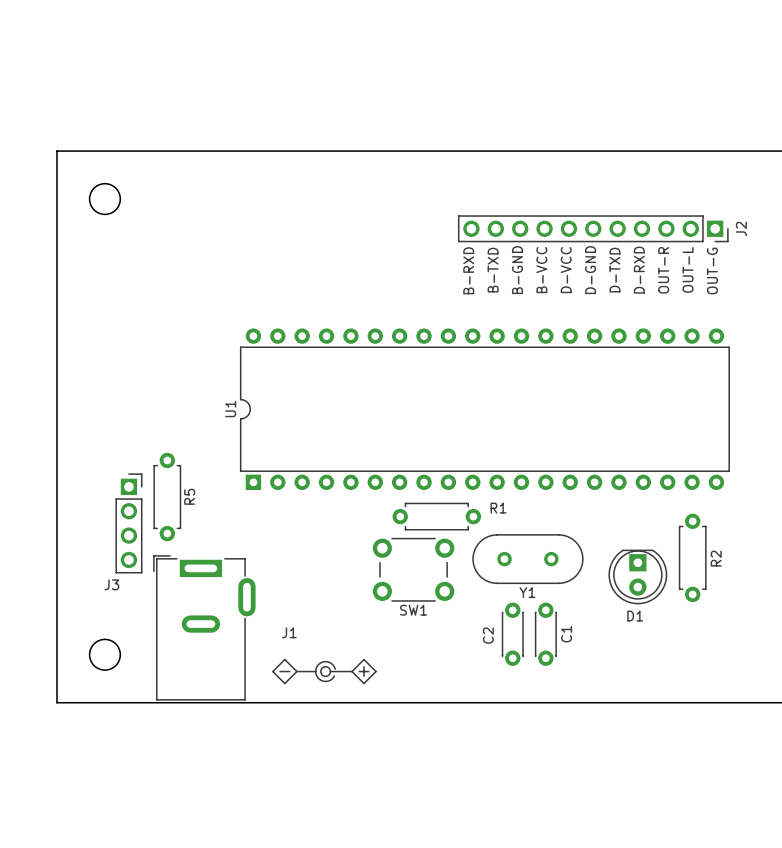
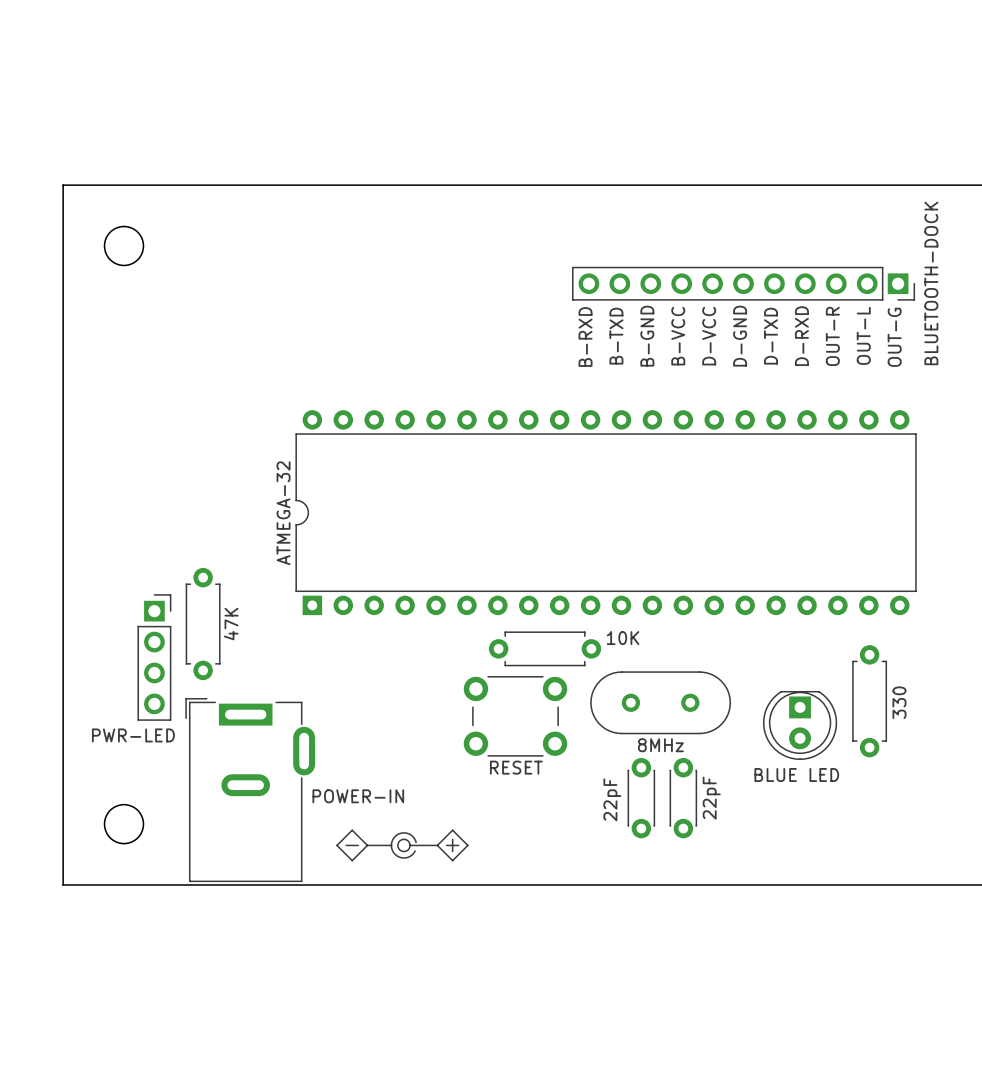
J2 name: J2 (741, 229) -> BLUETOOTH-DOCK (931, 283)
U1 name: U1 (230, 408) -> ATMEGA-32 (283, 513)
R5 name: R5 (189, 496) -> 47K (231, 624)
R1 name: R1 (498, 508) -> 10K (623, 638)
R2 name: R2 (716, 558) -> 330 (899, 702)
J3 name: J3 (111, 584) -> PWR-LED (133, 735)
Y1 name: Y1 (527, 592) -> 8MHz (660, 745)
SW1 name: SW1 (413, 610) -> RESET (516, 767)
D1 name: D1 (635, 616) -> BLUE LED (796, 775)
J1 name: J1 (289, 632) -> POWER-IN (358, 796)
C1 name: C1 (566, 634) -> 22pF (711, 798)
C2 name: C2 (488, 635) -> 22pF (612, 799)

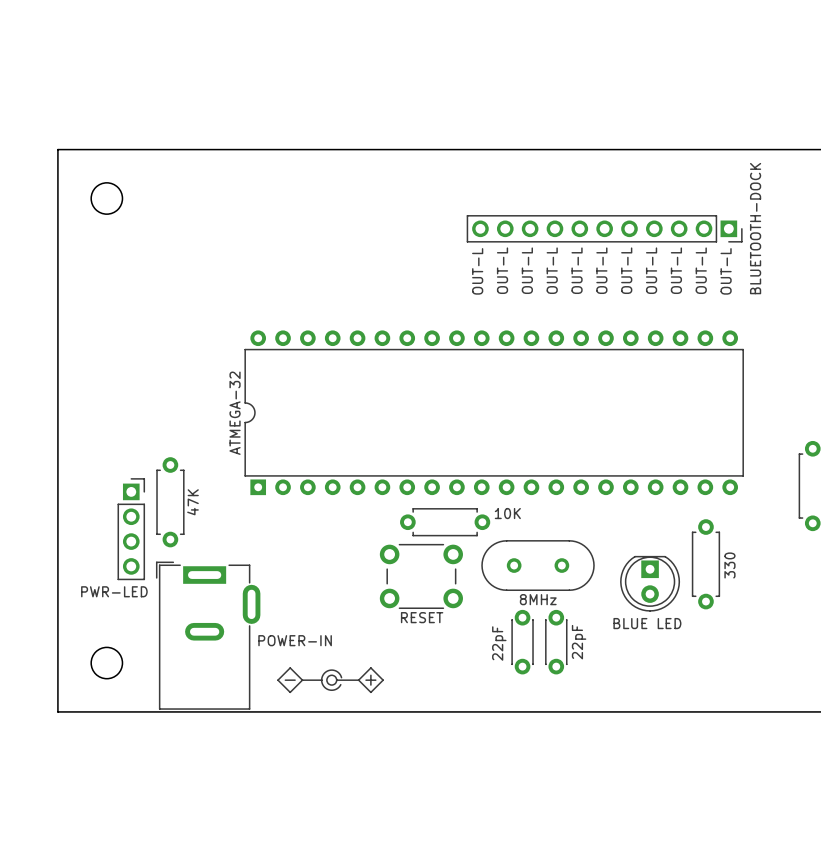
text: B-RXD (585, 336) -> OUT-L (477, 271)
text: B-TXD (616, 336) -> OUT-L (502, 270)
text: B-GND (647, 336) -> OUT-L (527, 270)
text: B-VCC (678, 336) -> OUT-L (552, 270)
text: D-VCC (709, 336) -> OUT-L (577, 270)
text: D-GND (740, 336) -> OUT-L (601, 270)
text: D-TXD (771, 336) -> OUT-L (626, 270)
text: D-RXD (801, 336) -> OUT-L (651, 270)
text: OUT-R (832, 336) -> OUT-L (676, 270)
text: OUT-G (894, 337) -> OUT-L (726, 271)

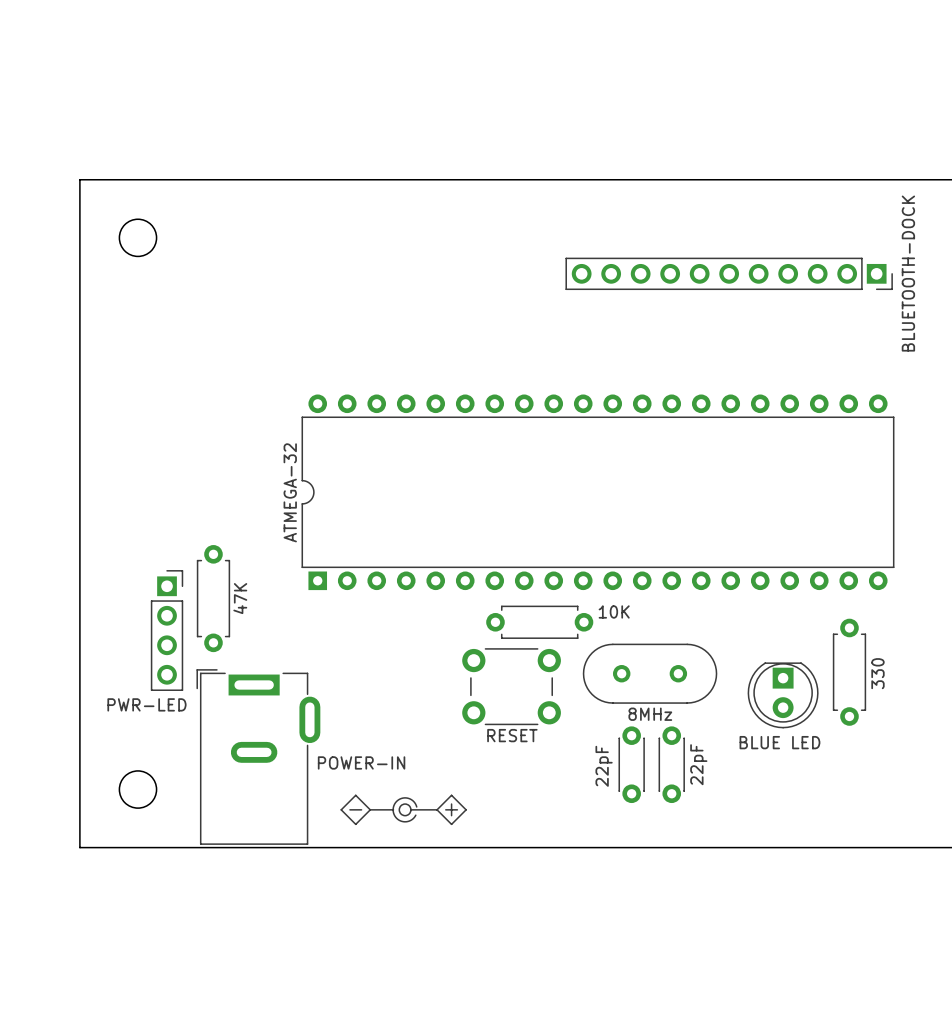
text: OUT-L (502, 270) -> none
text: OUT-L (527, 270) -> none
text: OUT-L (552, 270) -> none
text: OUT-L (577, 270) -> none
text: OUT-L (601, 270) -> none
text: OUT-L (626, 270) -> none
text: OUT-L (651, 270) -> none
text: OUT-L (676, 270) -> none
text: OUT-L (701, 270) -> none
text: OUT-L (477, 271) -> none
text: OUT-L (726, 271) -> none

